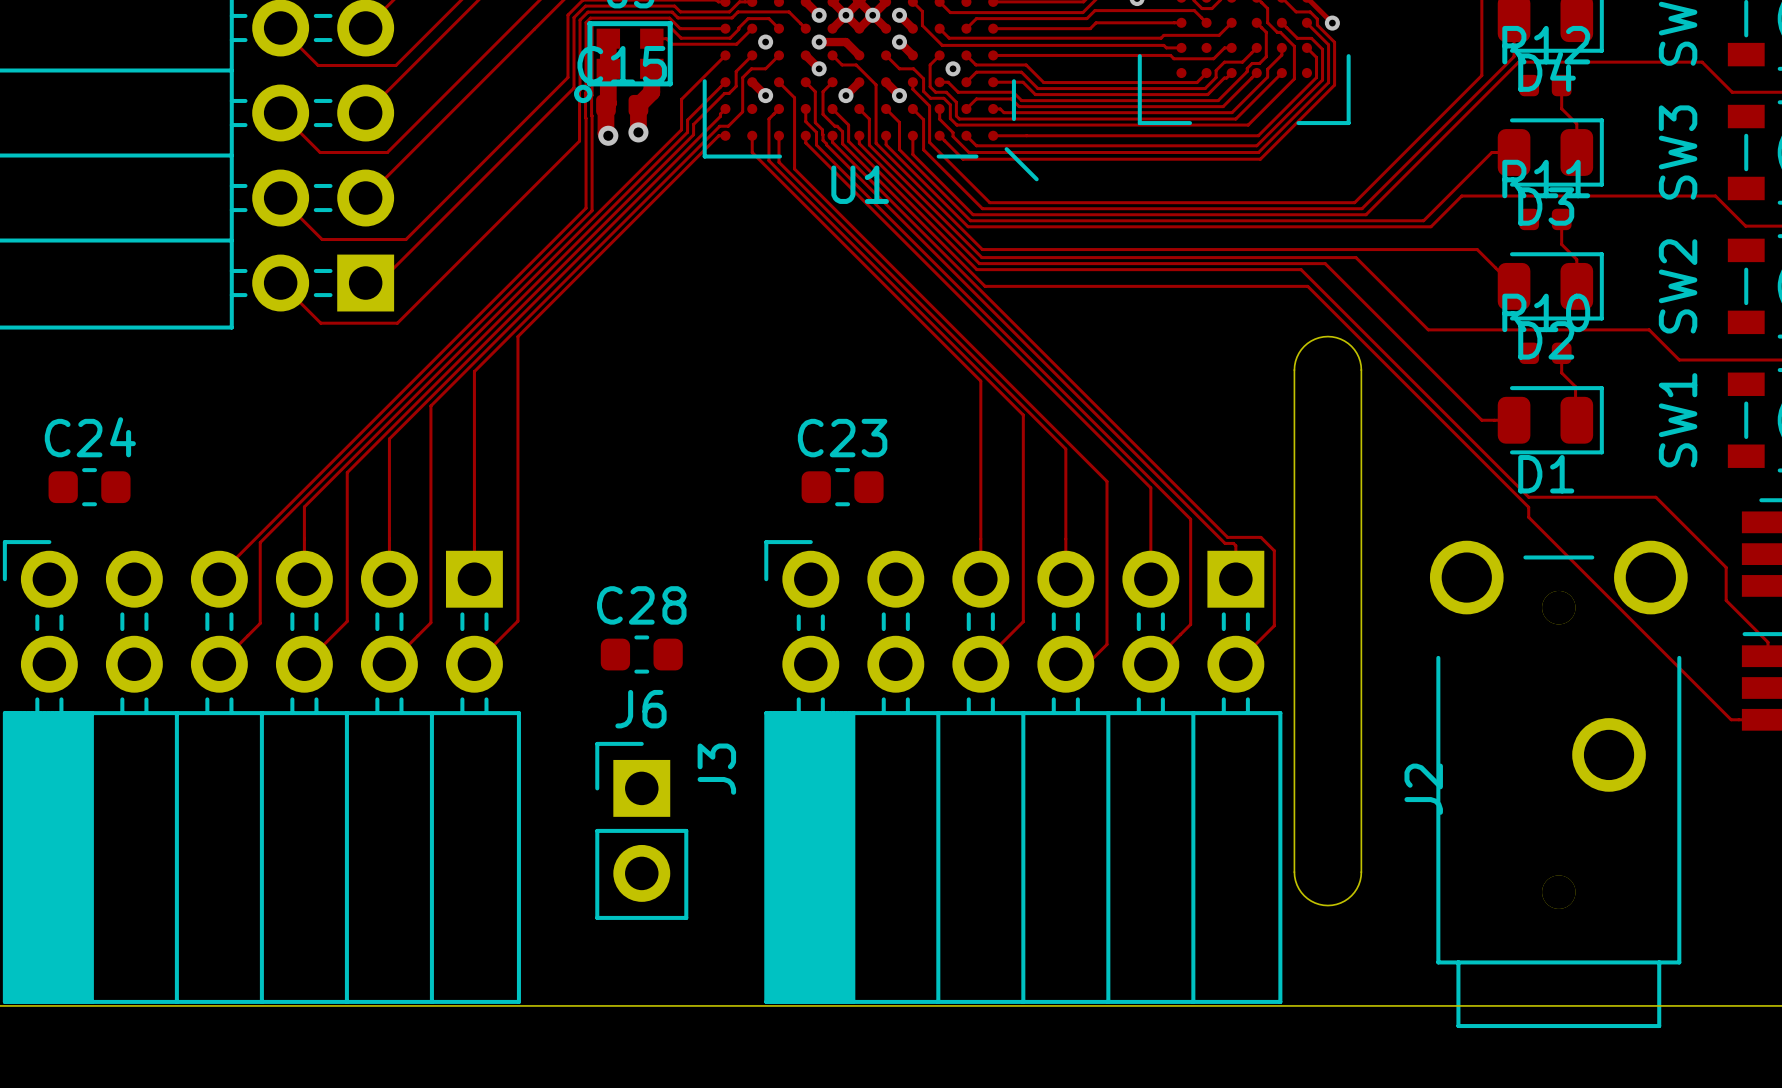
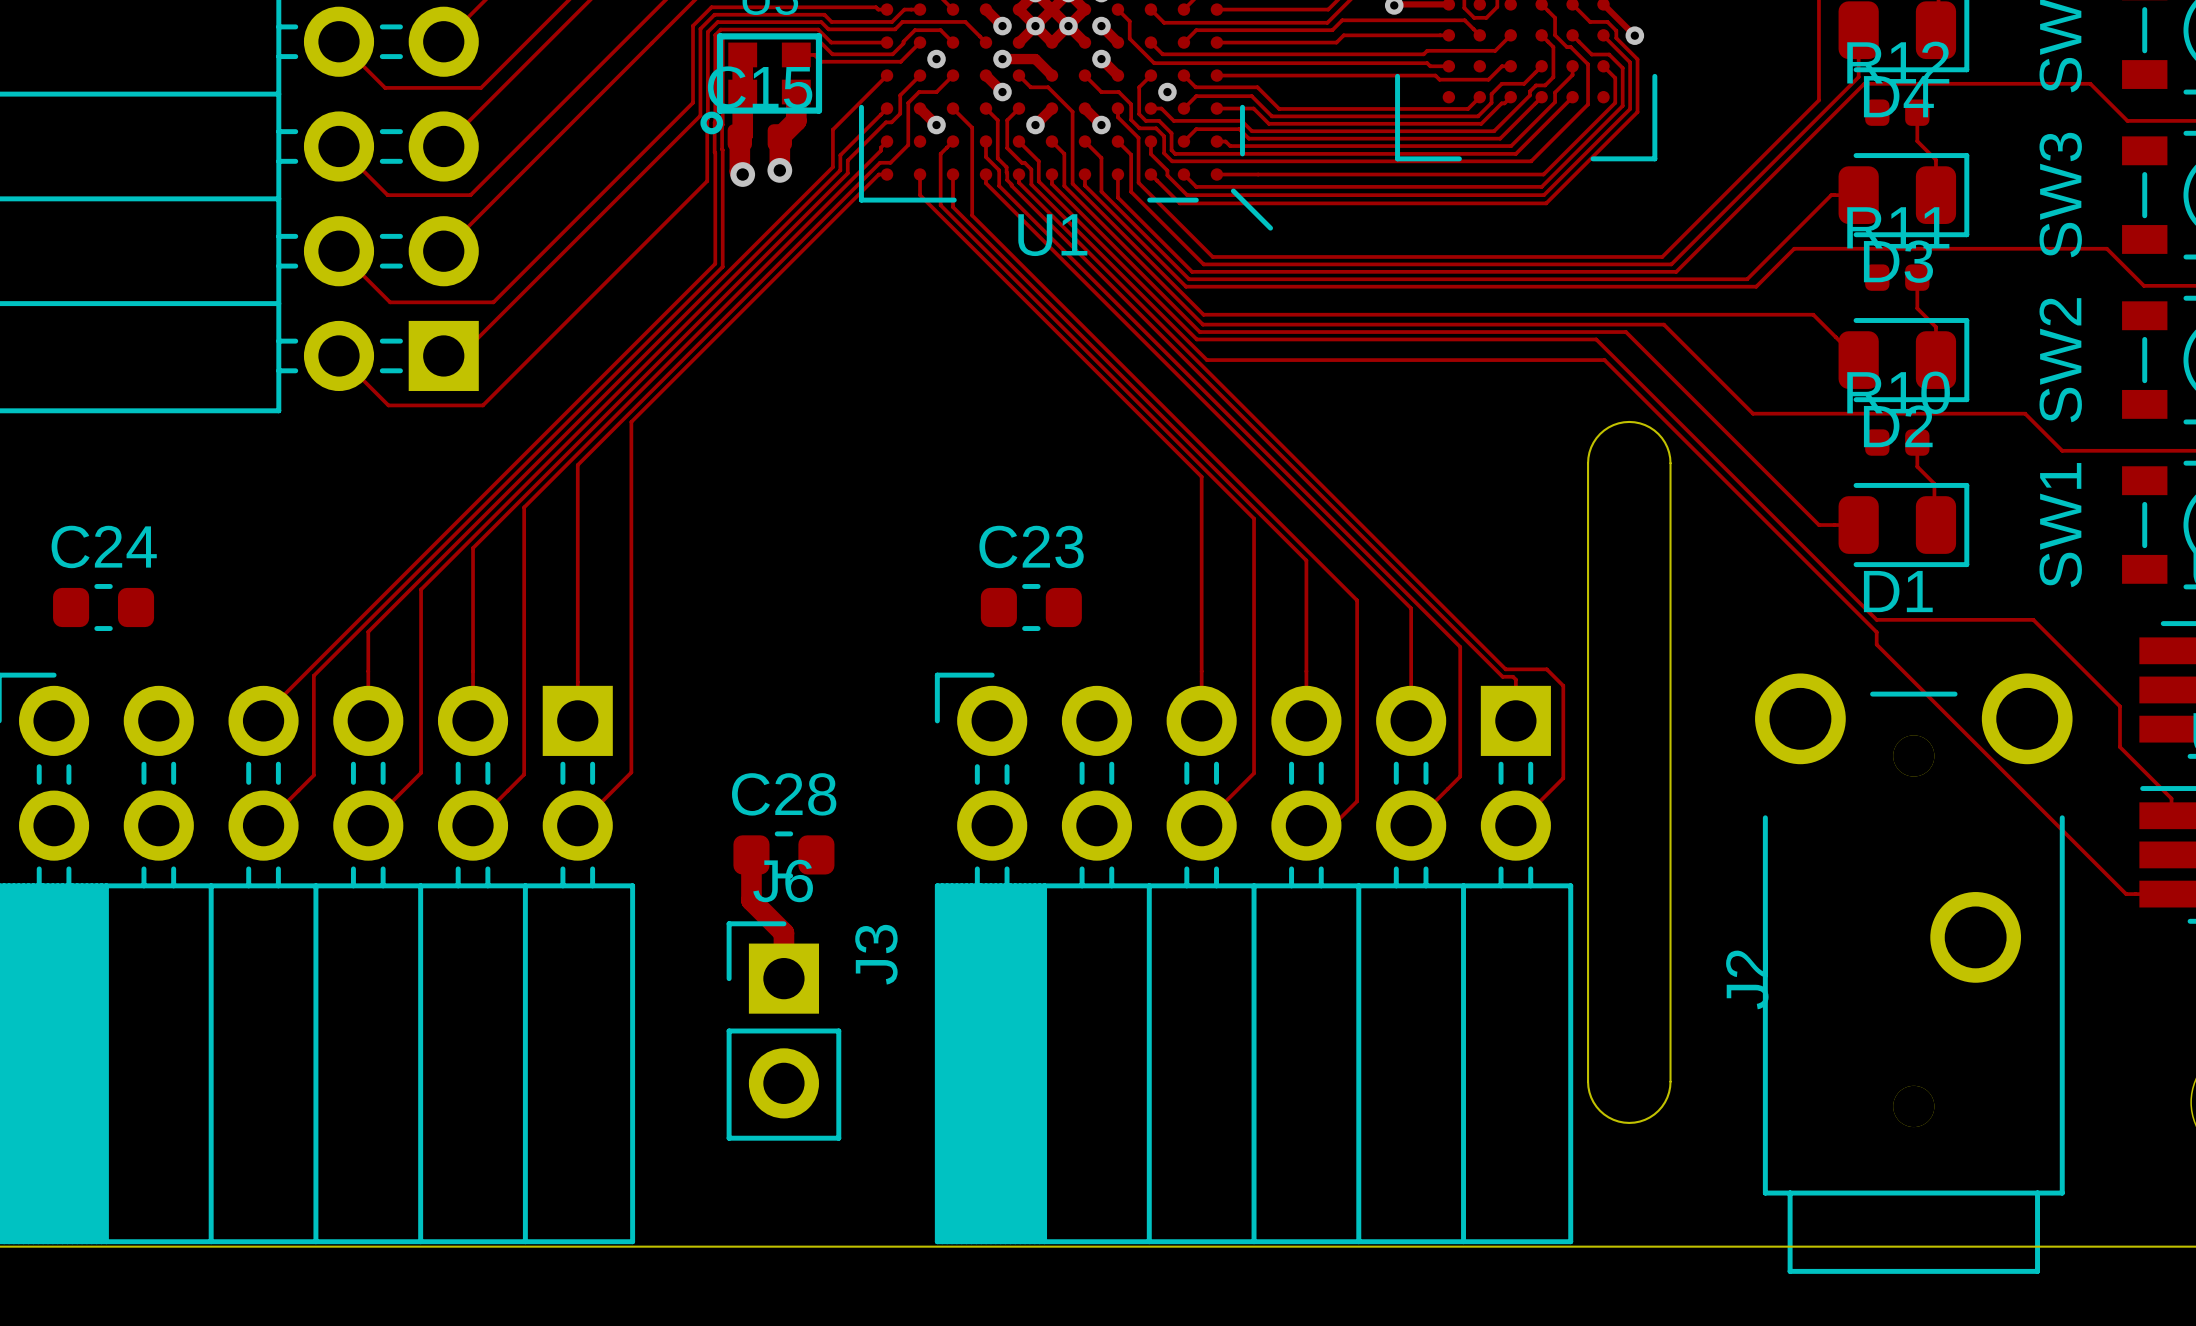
C28 position: (641, 654) -> (783, 854)
track: none -> (751, 854) (751, 900) (783, 933) (783, 978)

